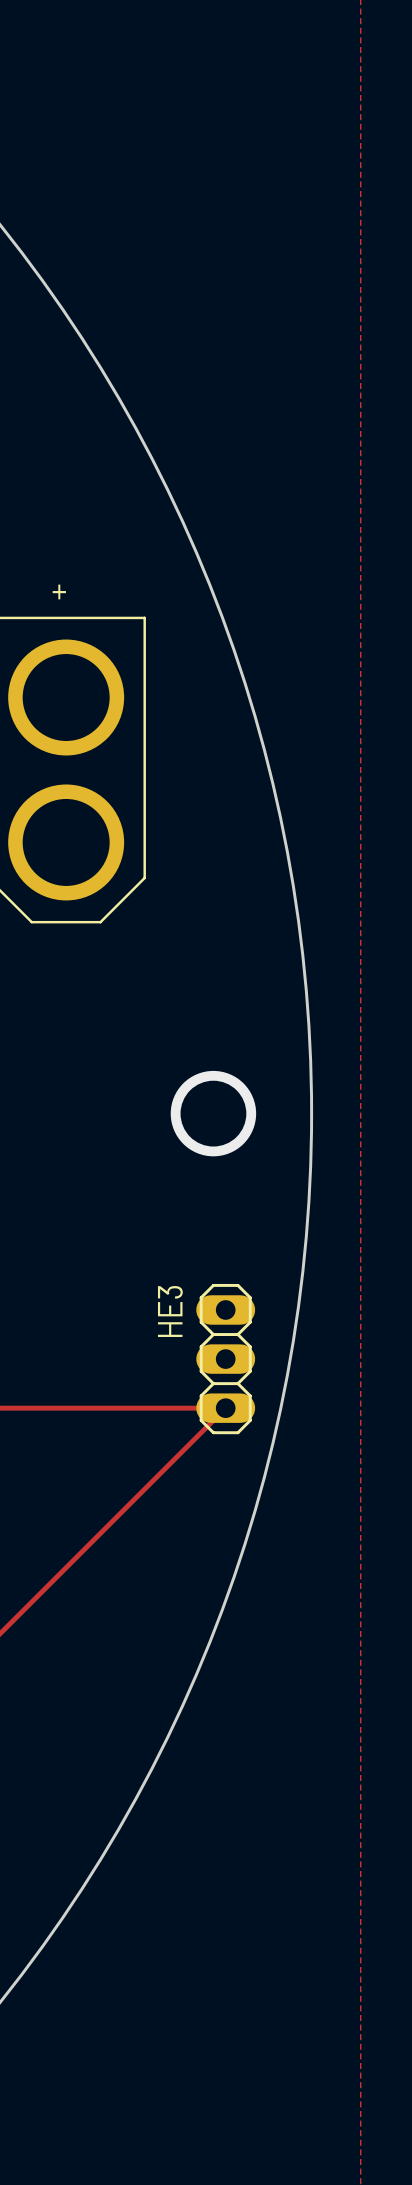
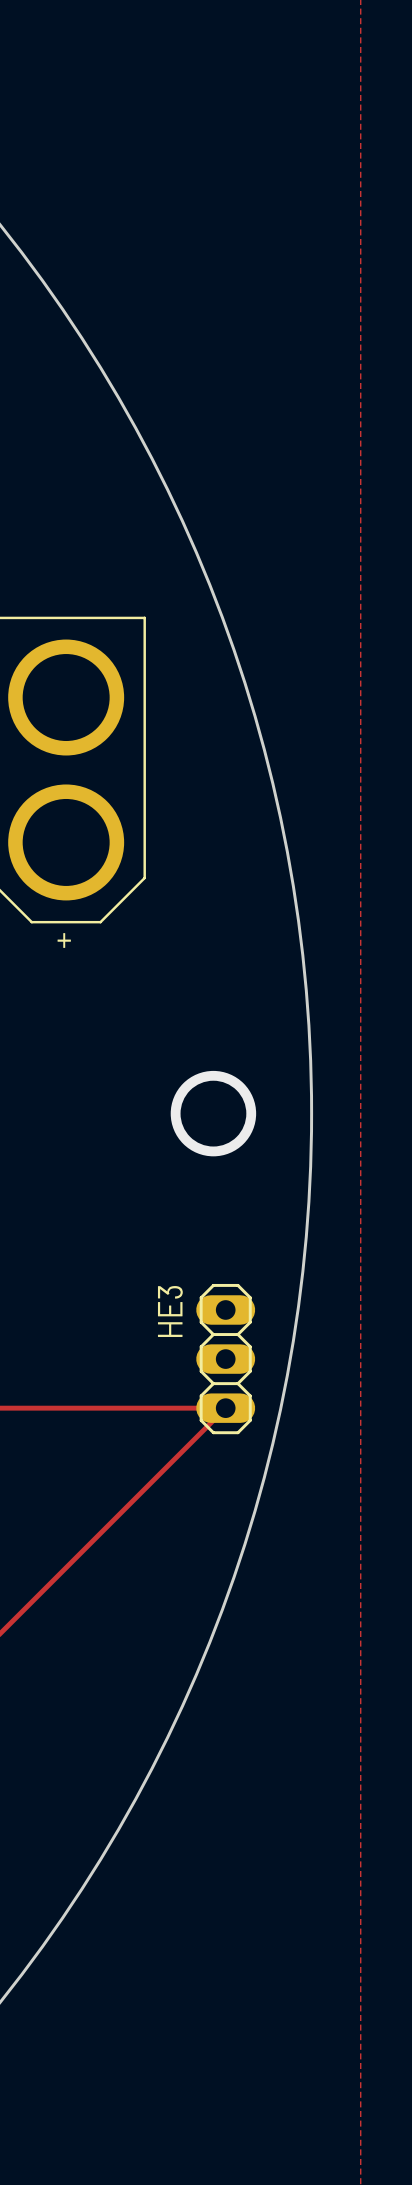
text position: + (59, 591) -> + (64, 940)

